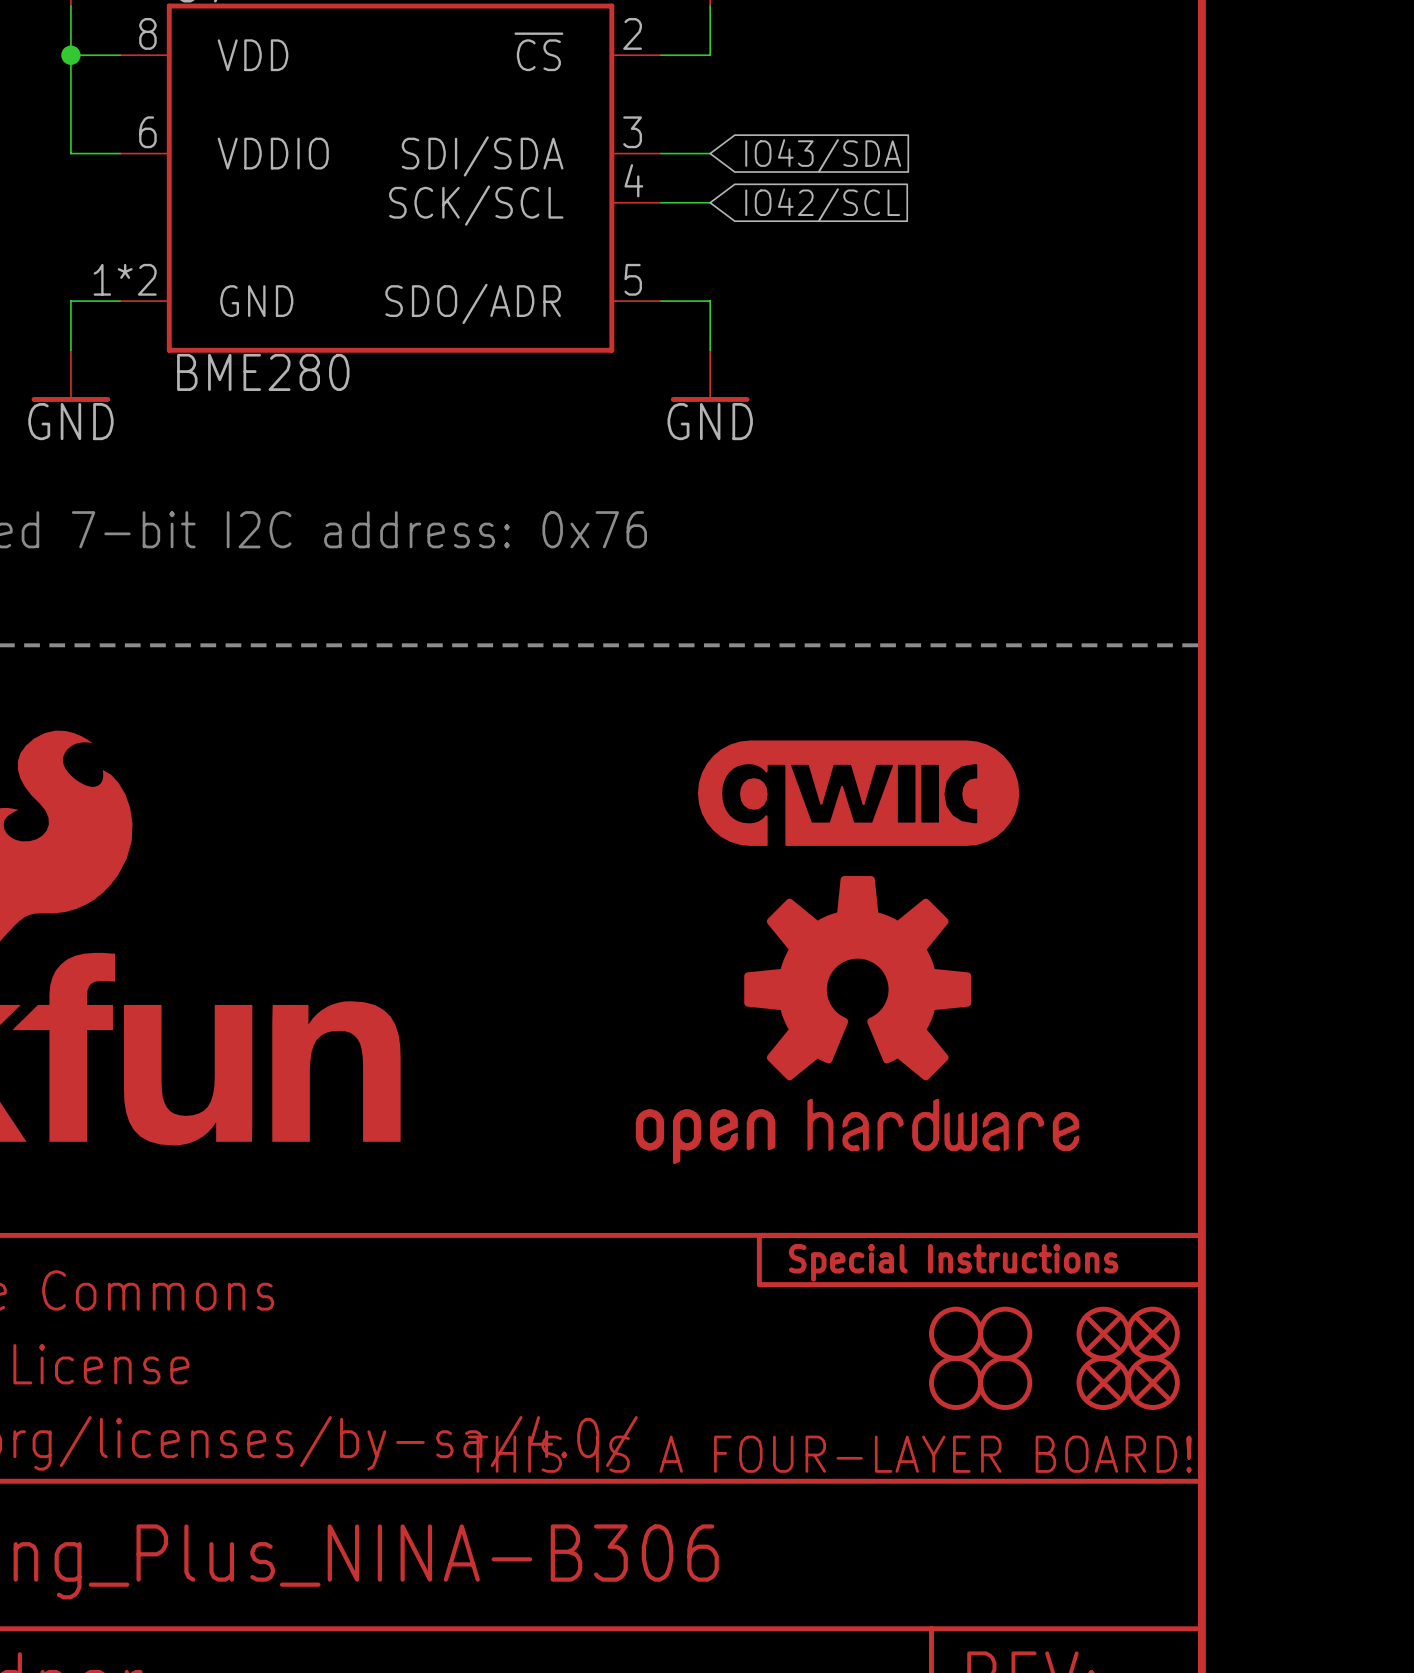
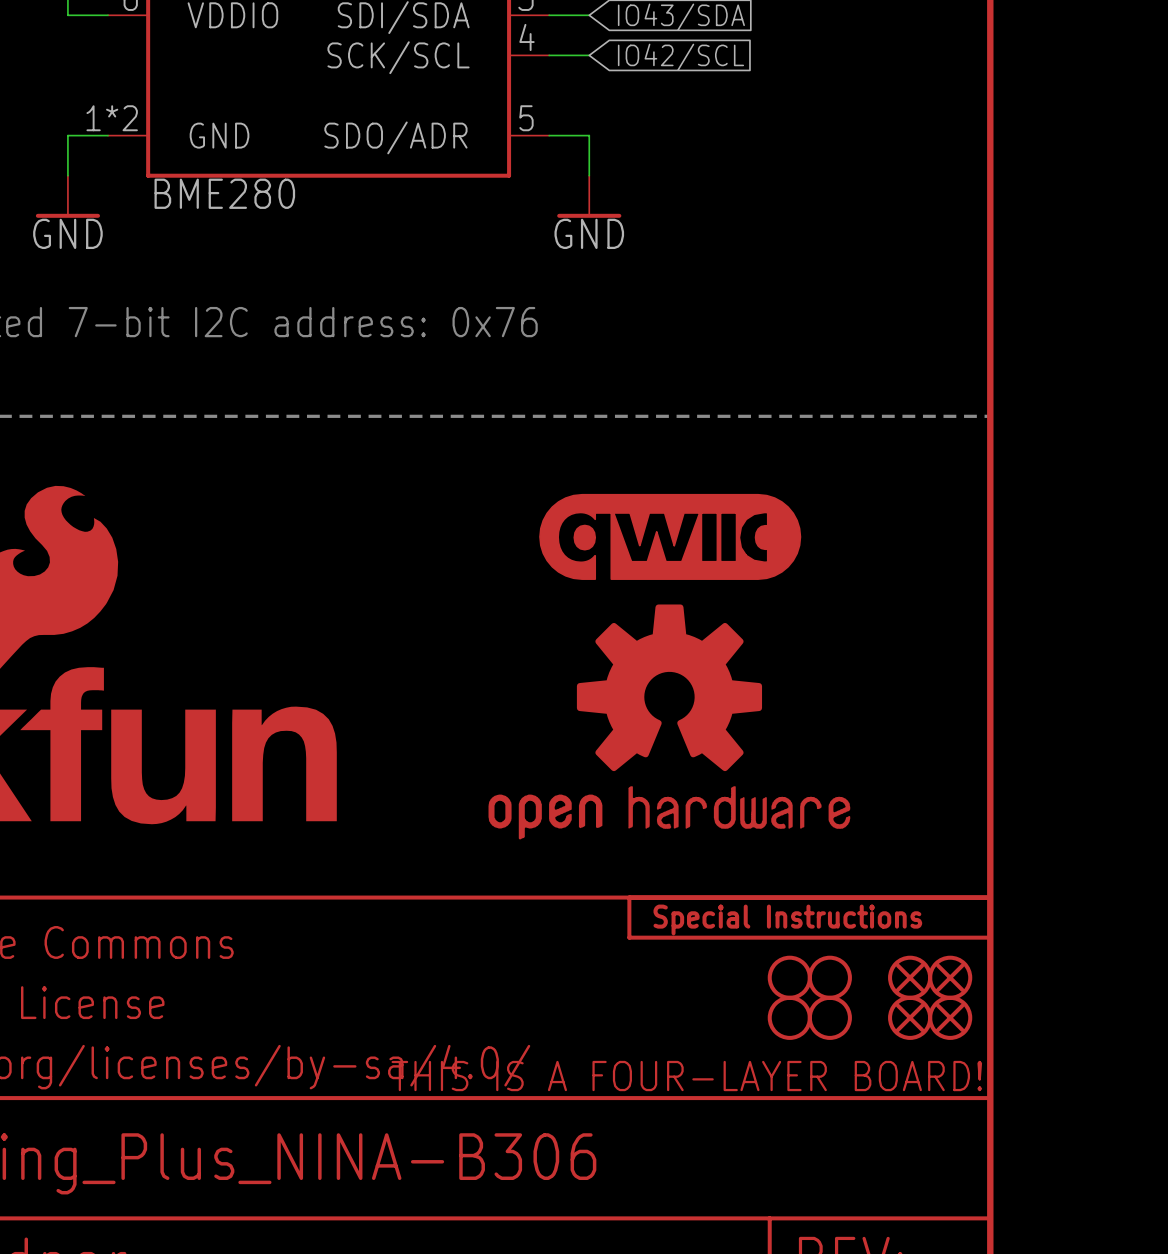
part position: (858, 793) -> (670, 536)
part position: (857, 1019) -> (669, 721)

